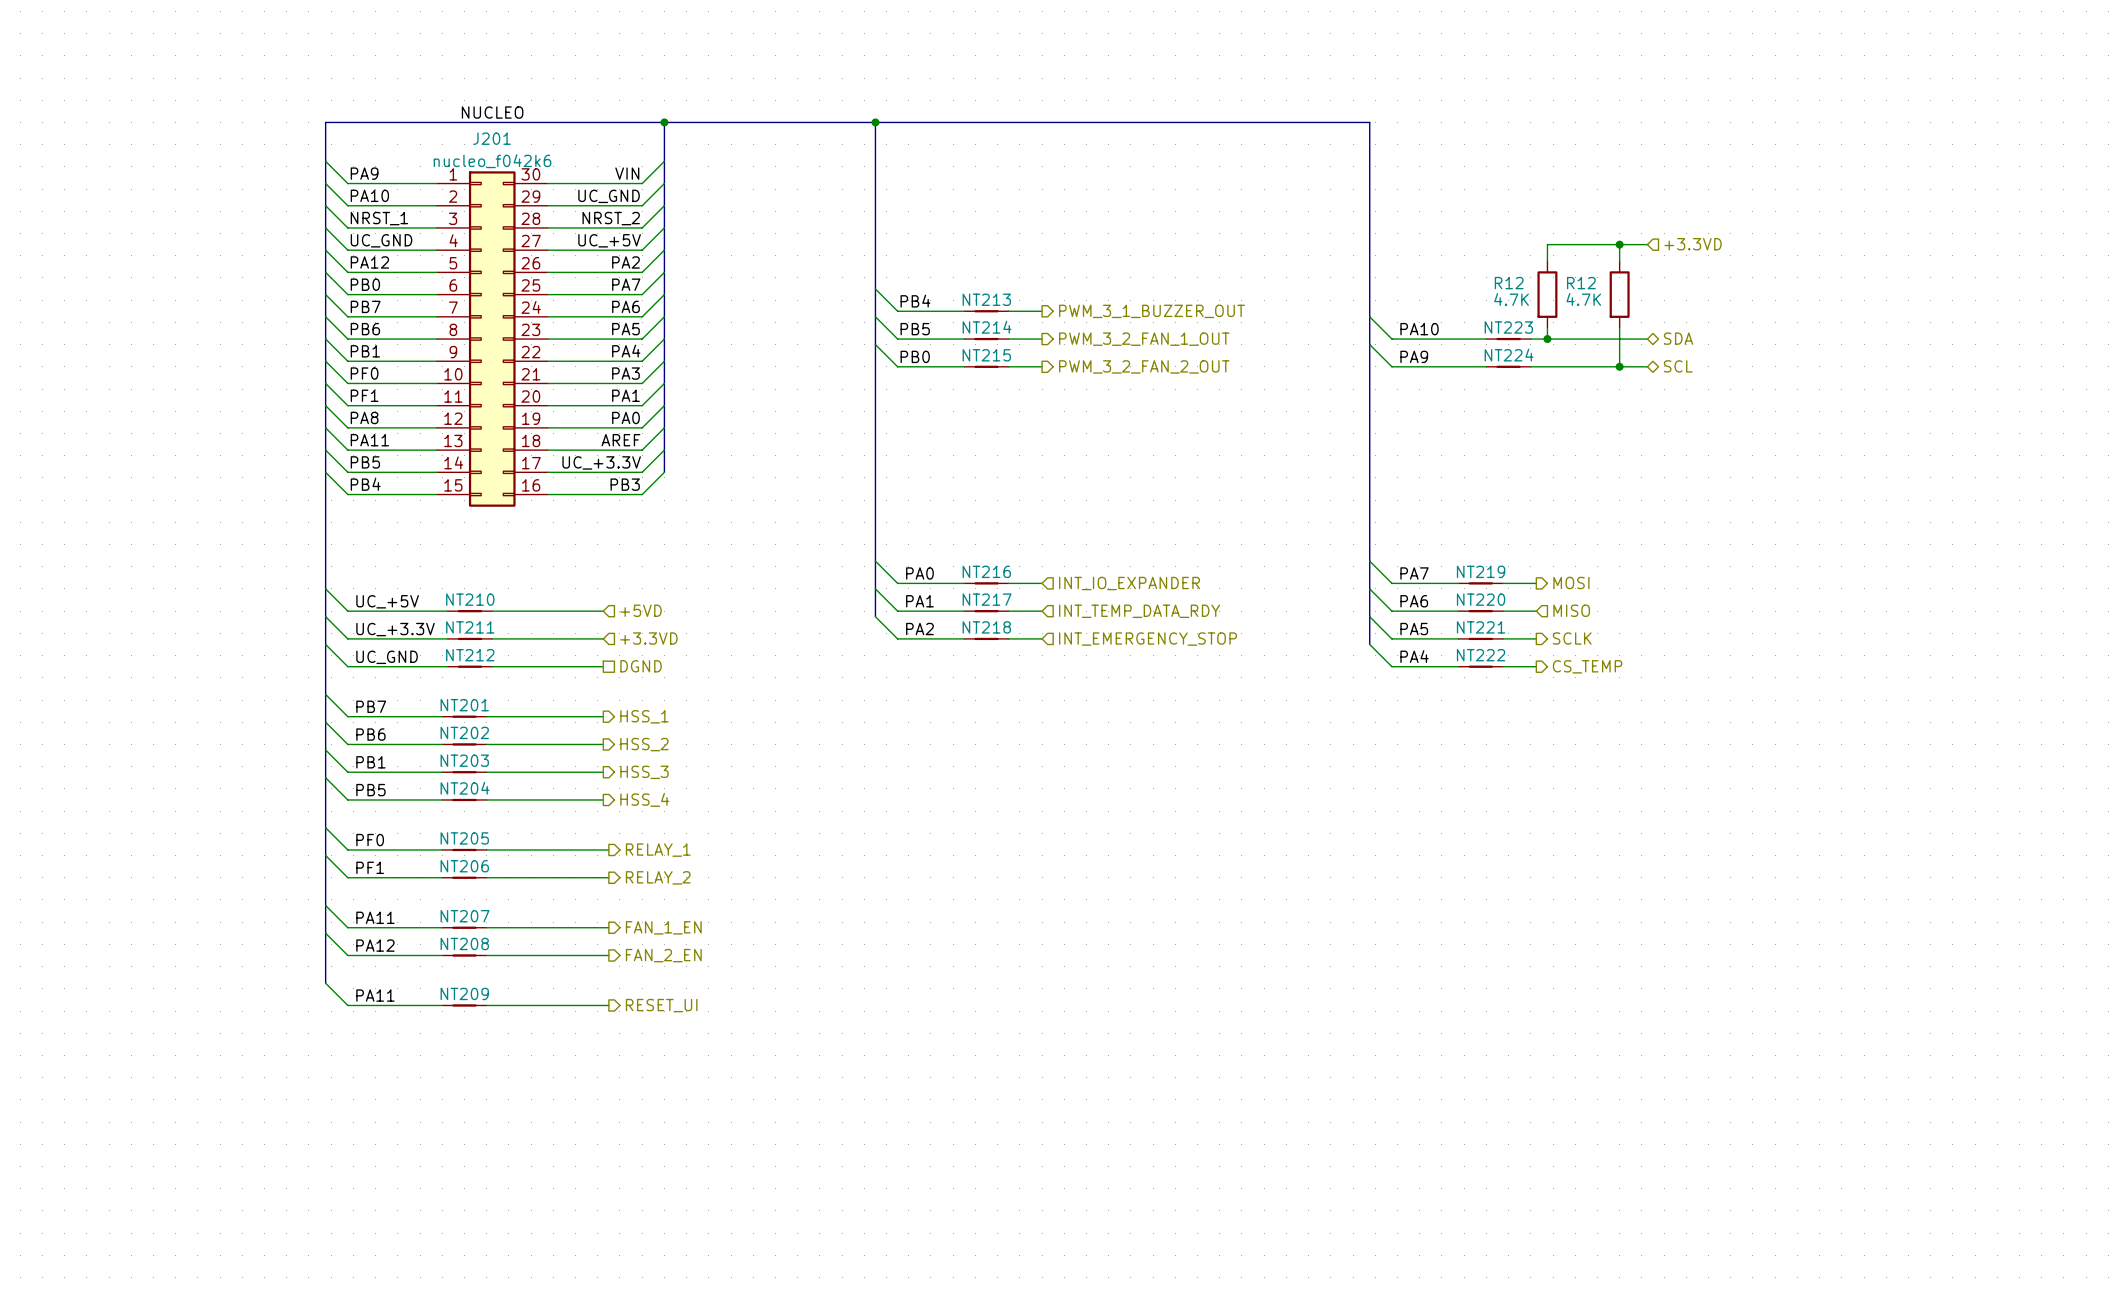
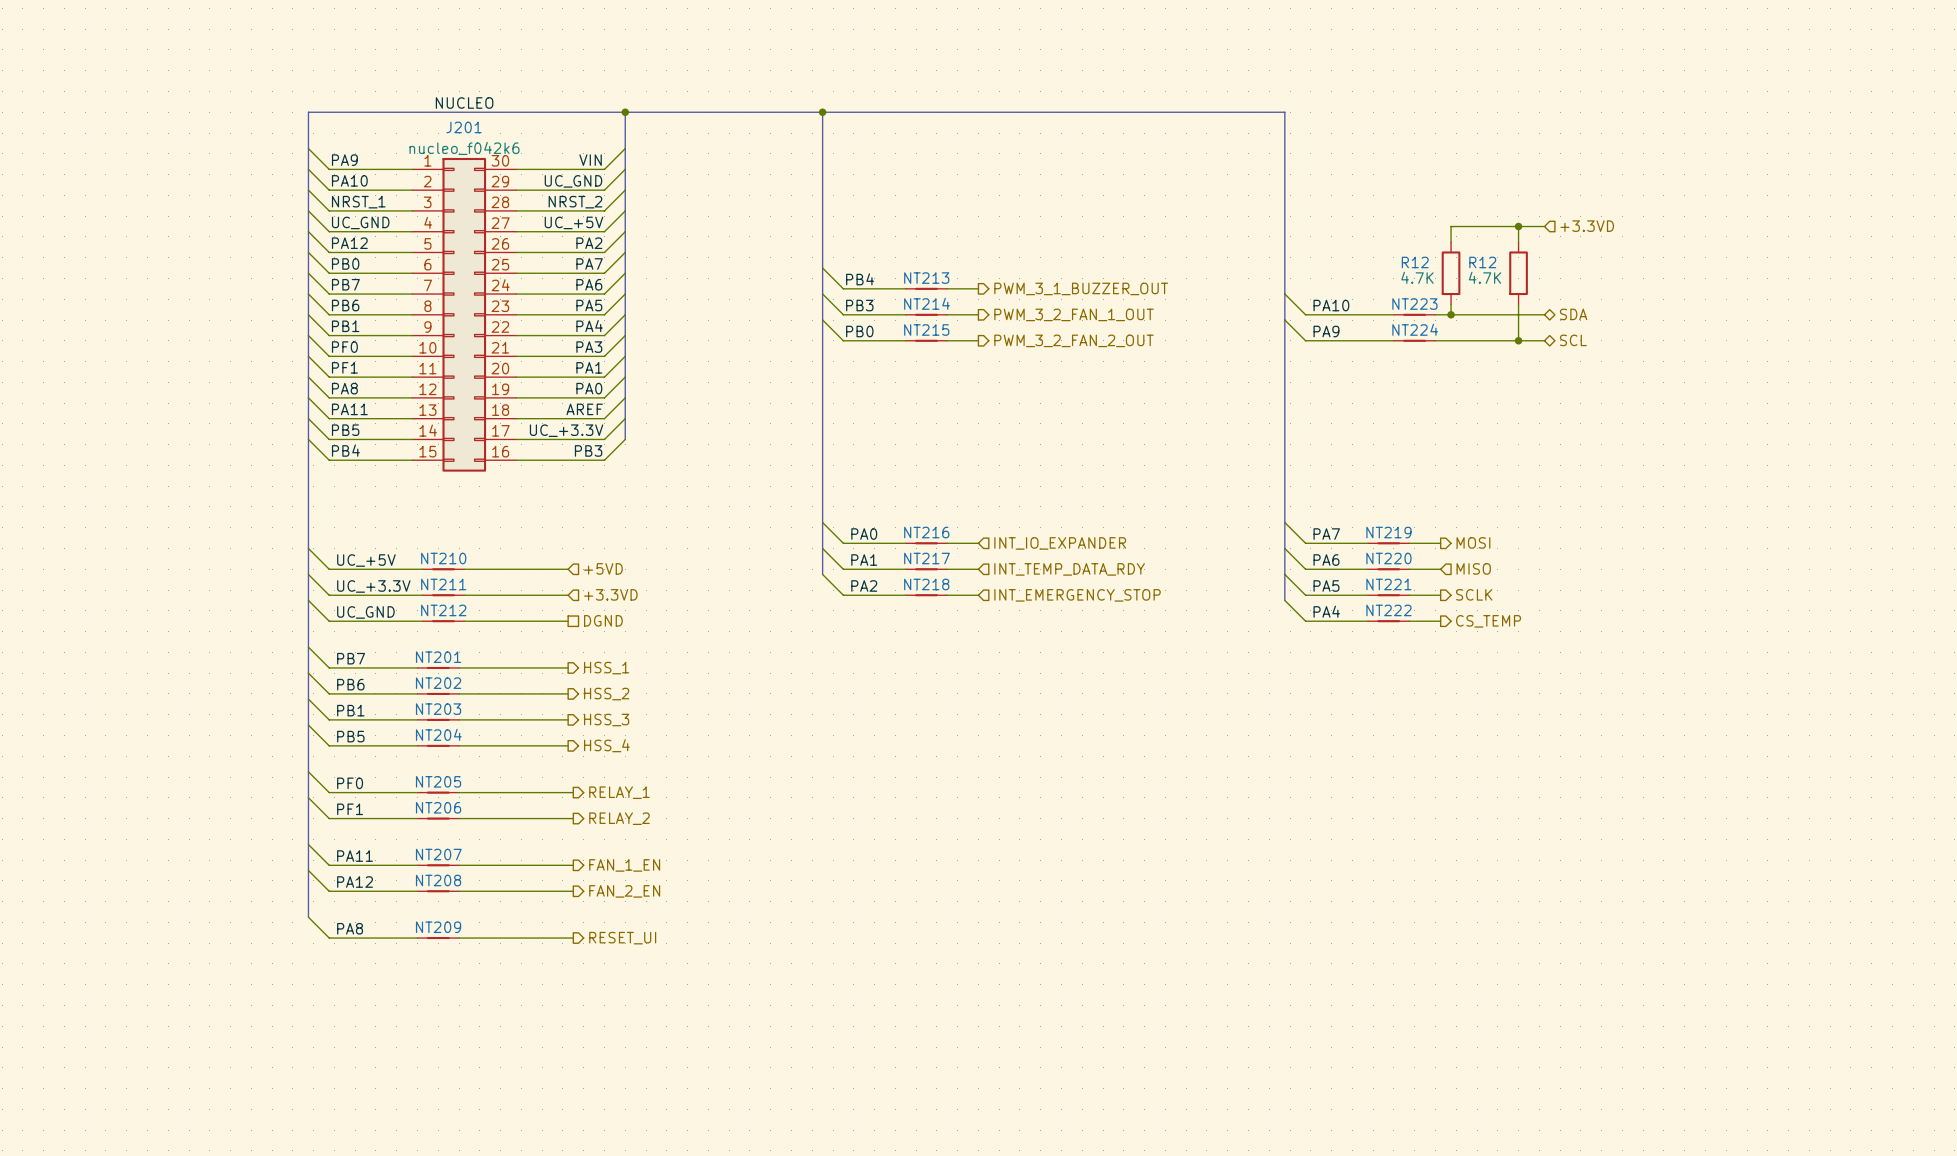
label: PB5 (915, 329) -> PB3 (859, 305)
label: PA11 (375, 995) -> PA8 (350, 928)

